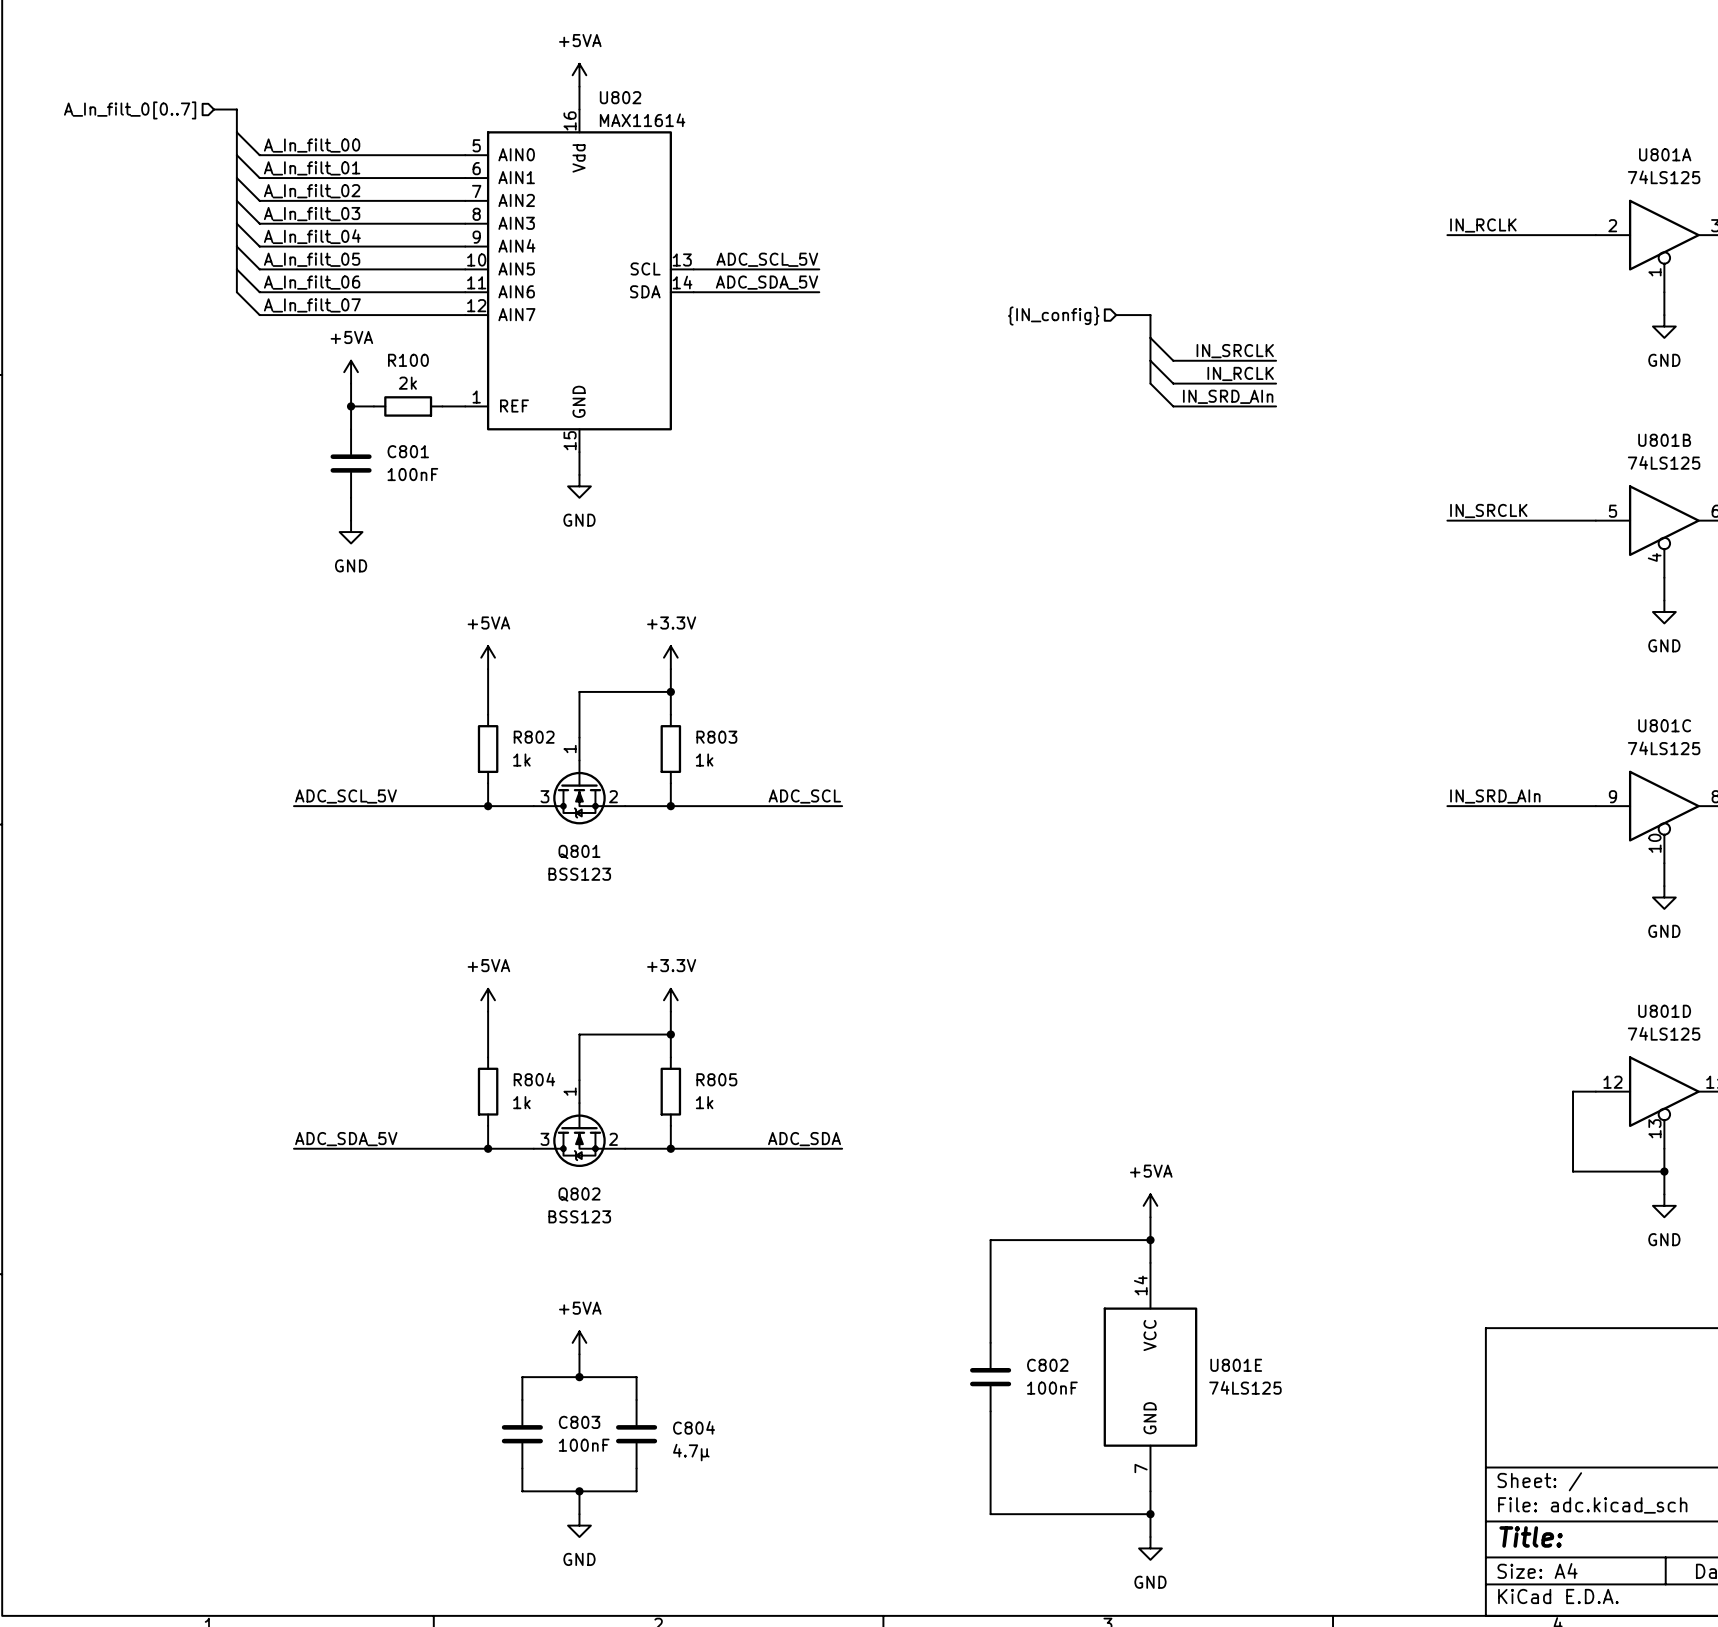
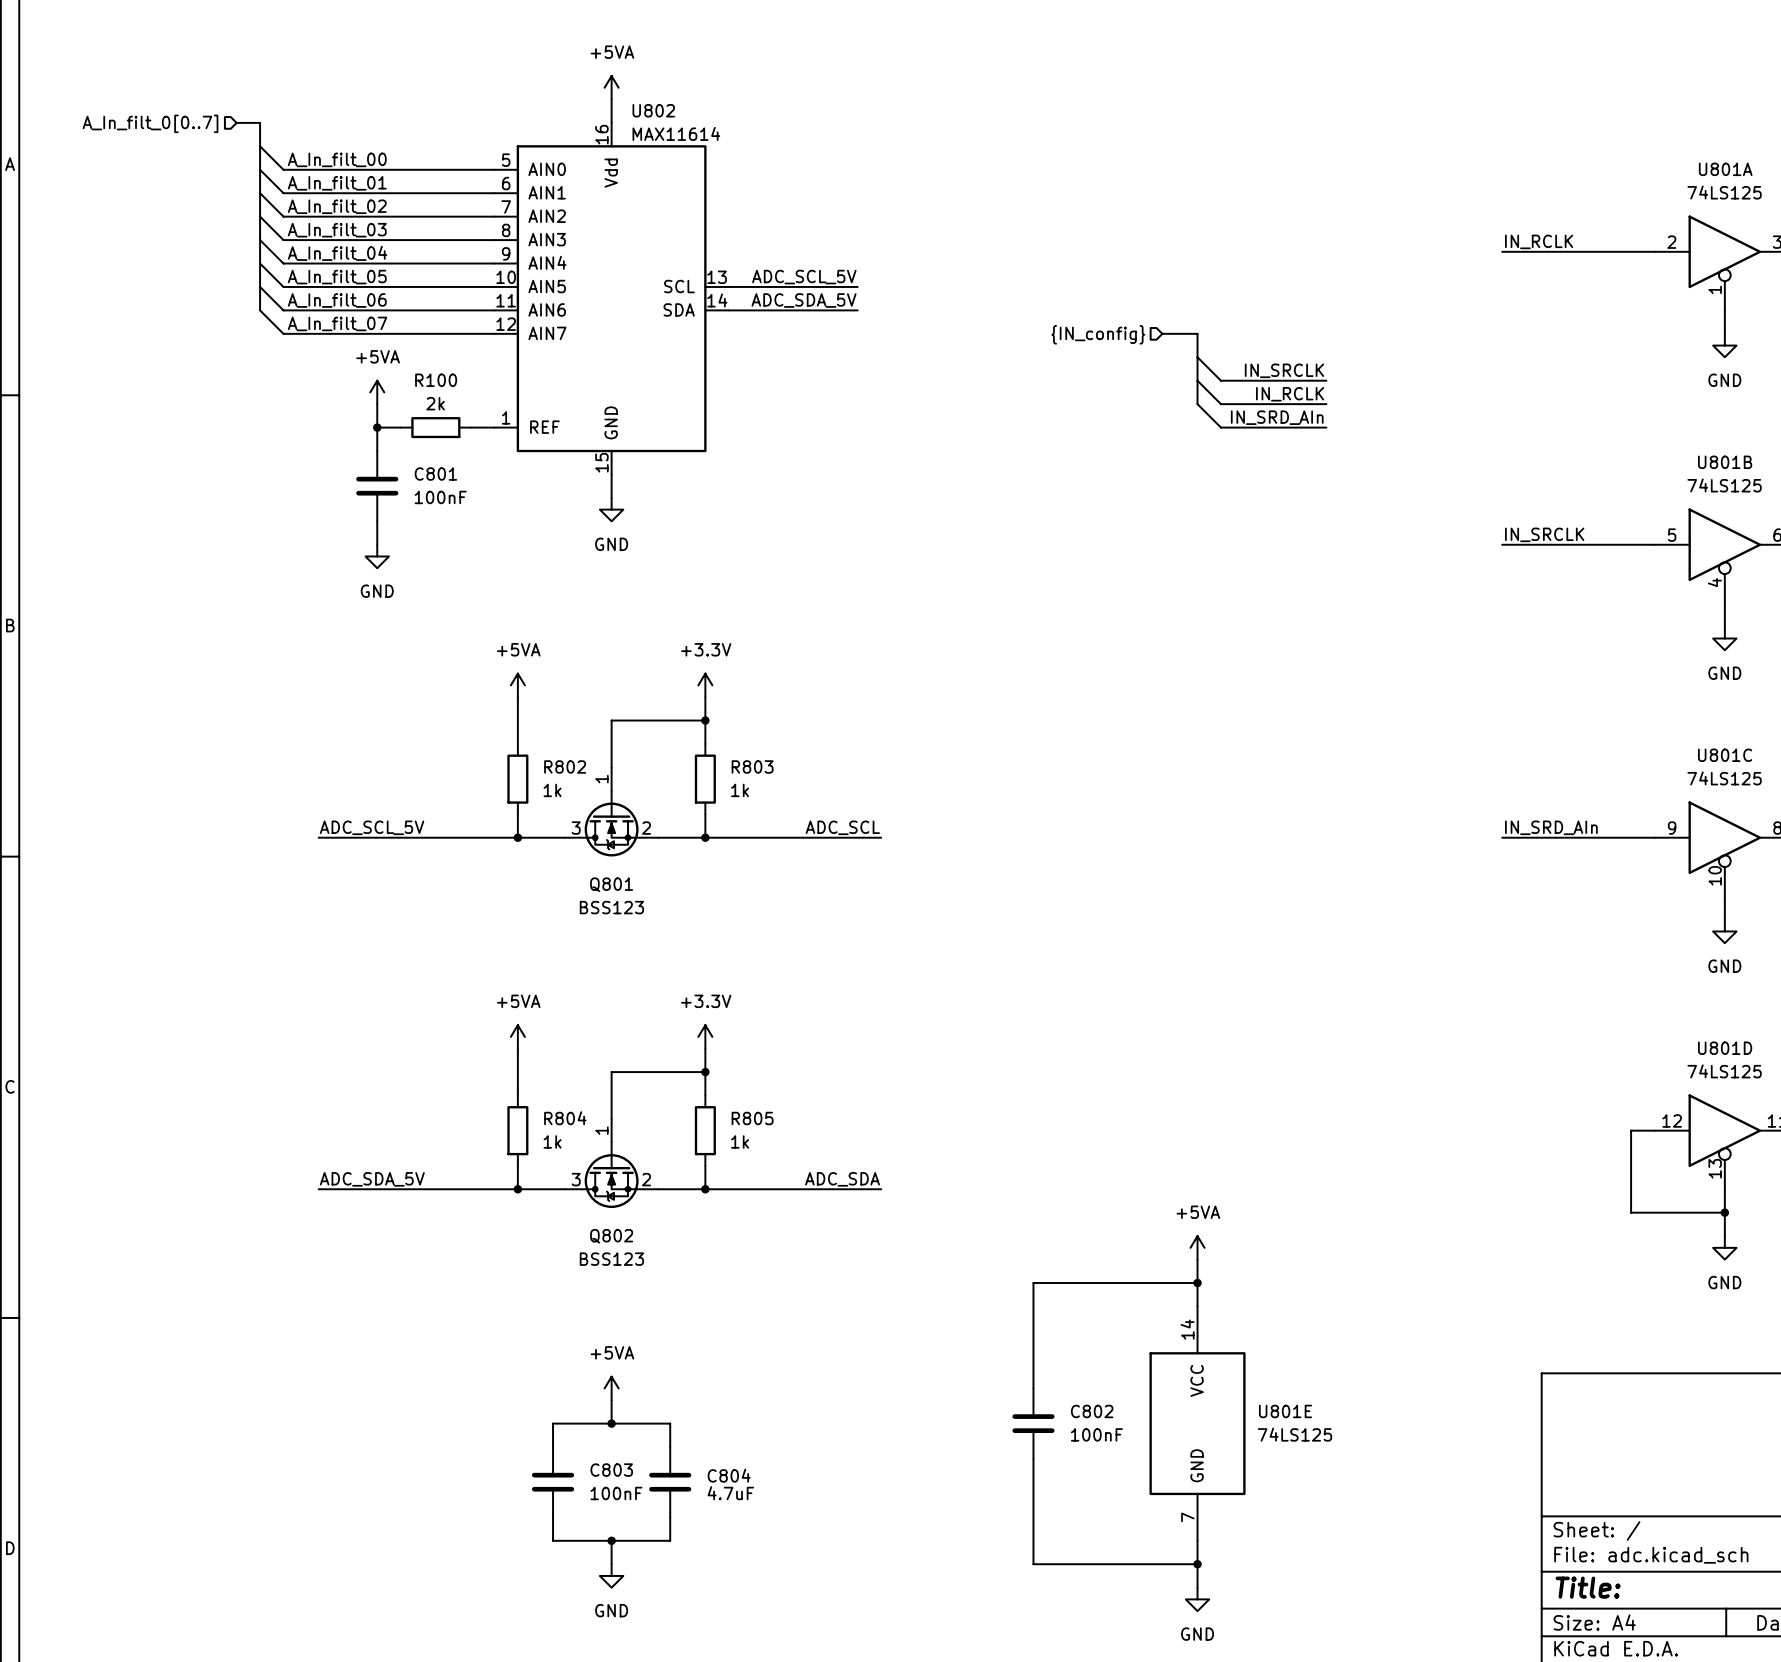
C804 value: 4.7µ (691, 1452) -> 4.7uF (730, 1493)

